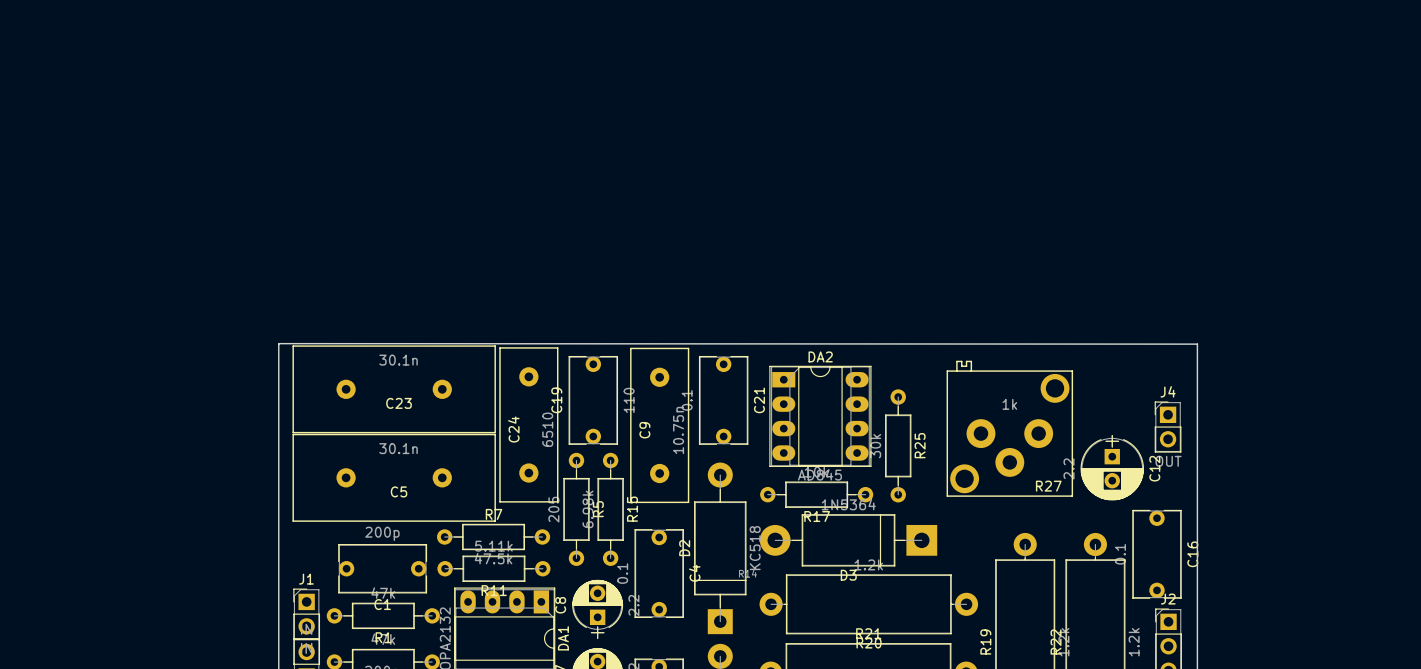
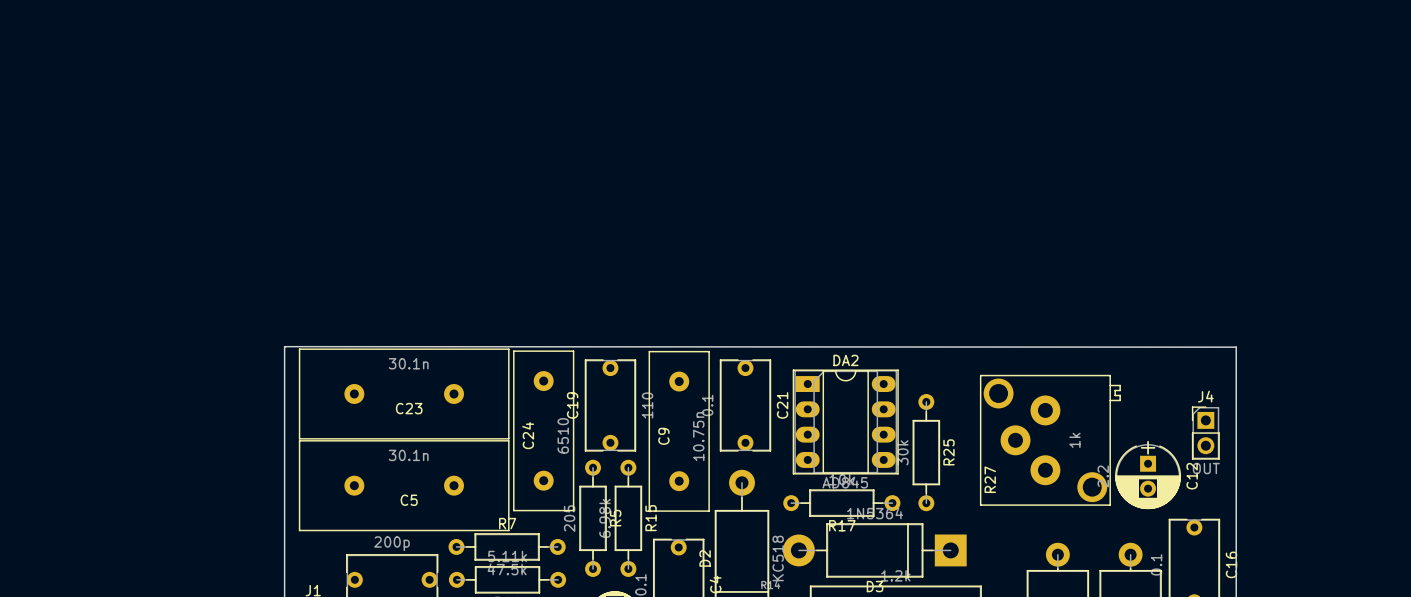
R27 rotation: 0° (1009, 428) -> 90° clockwise (1050, 440)

